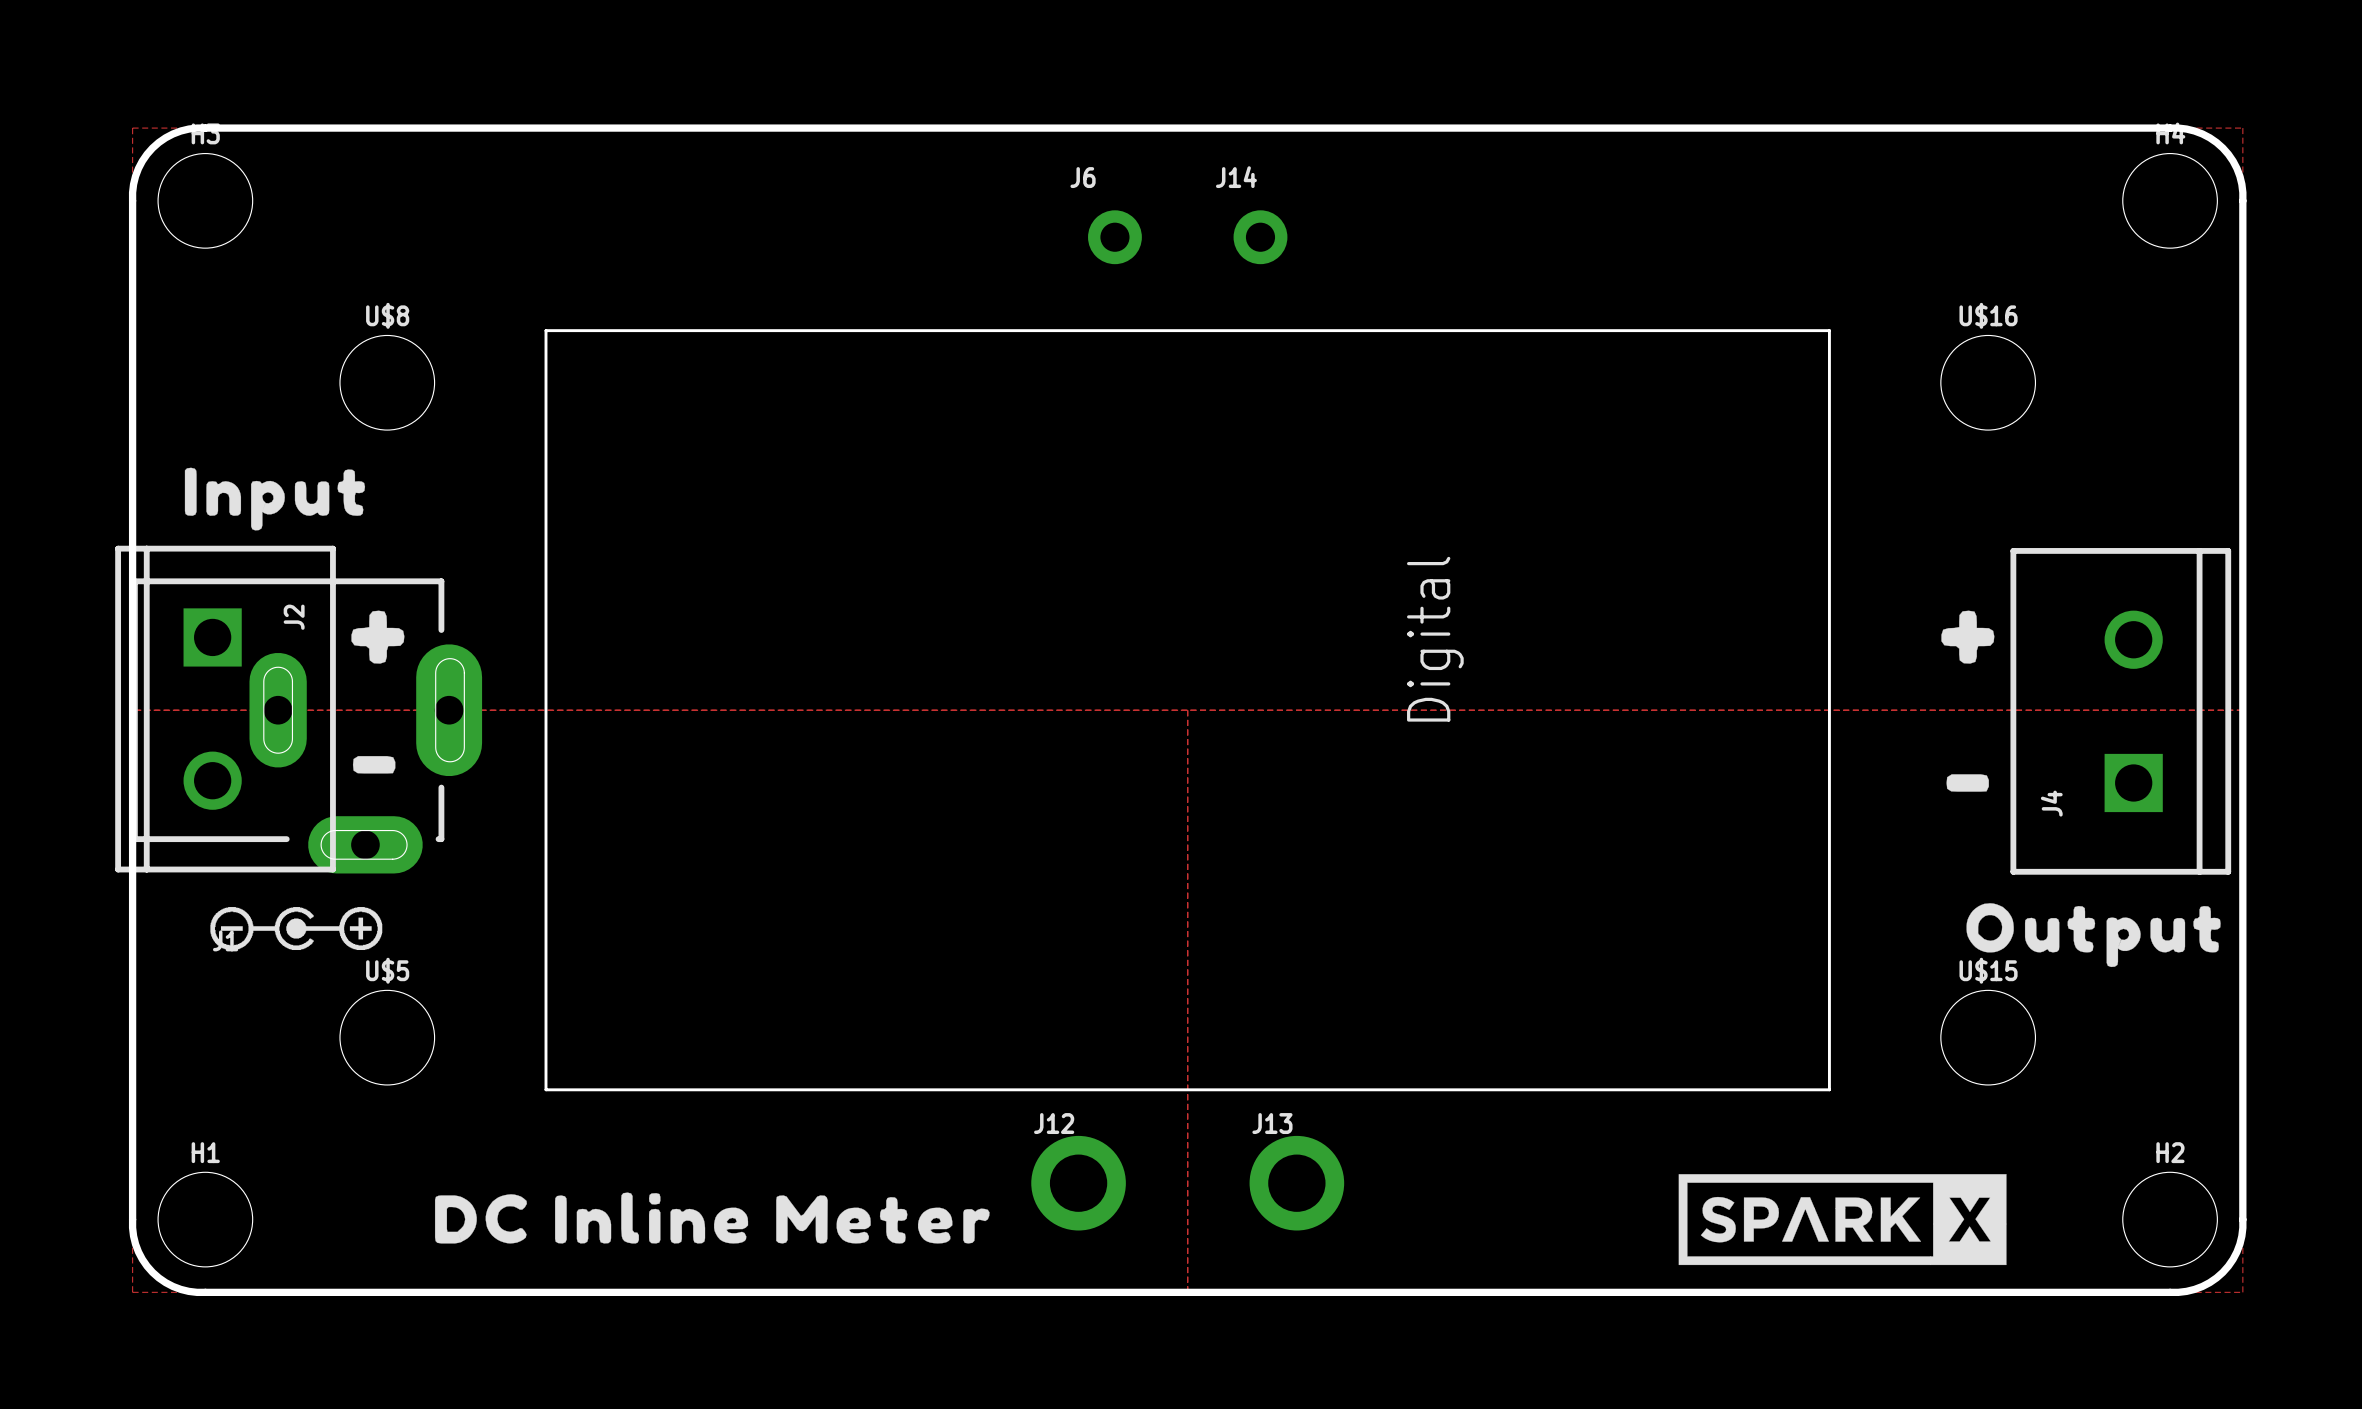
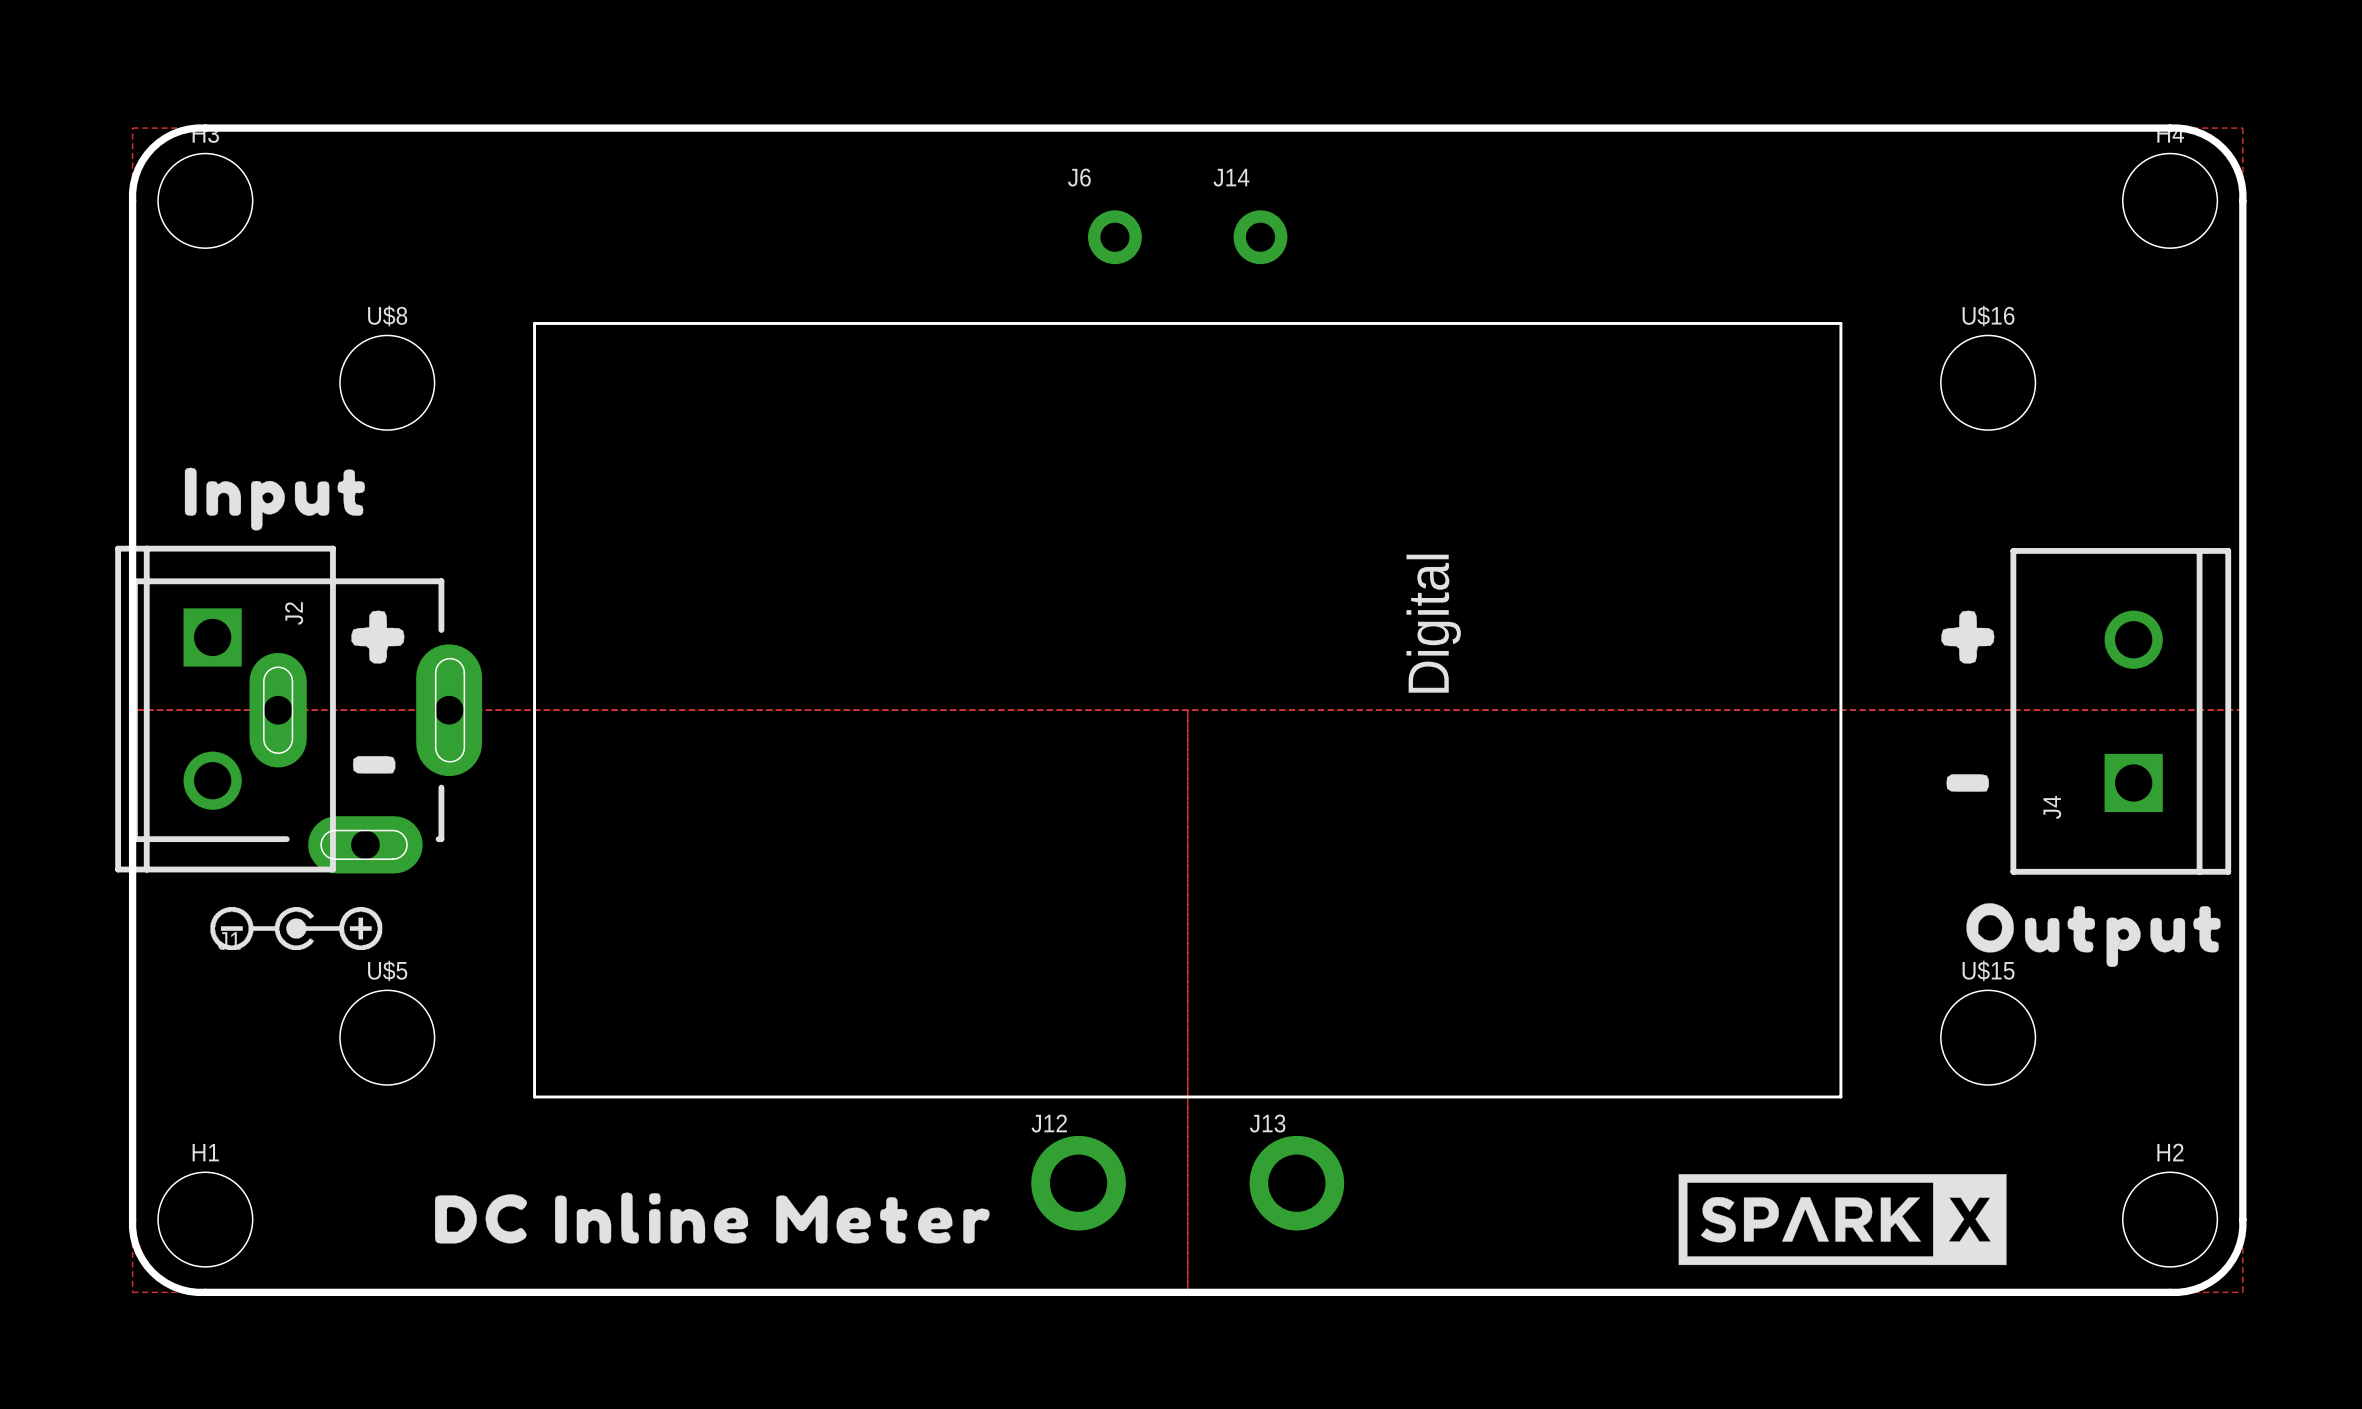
drawing shape: [544, 329, 1831, 1092] -> [533, 322, 1843, 1099]

